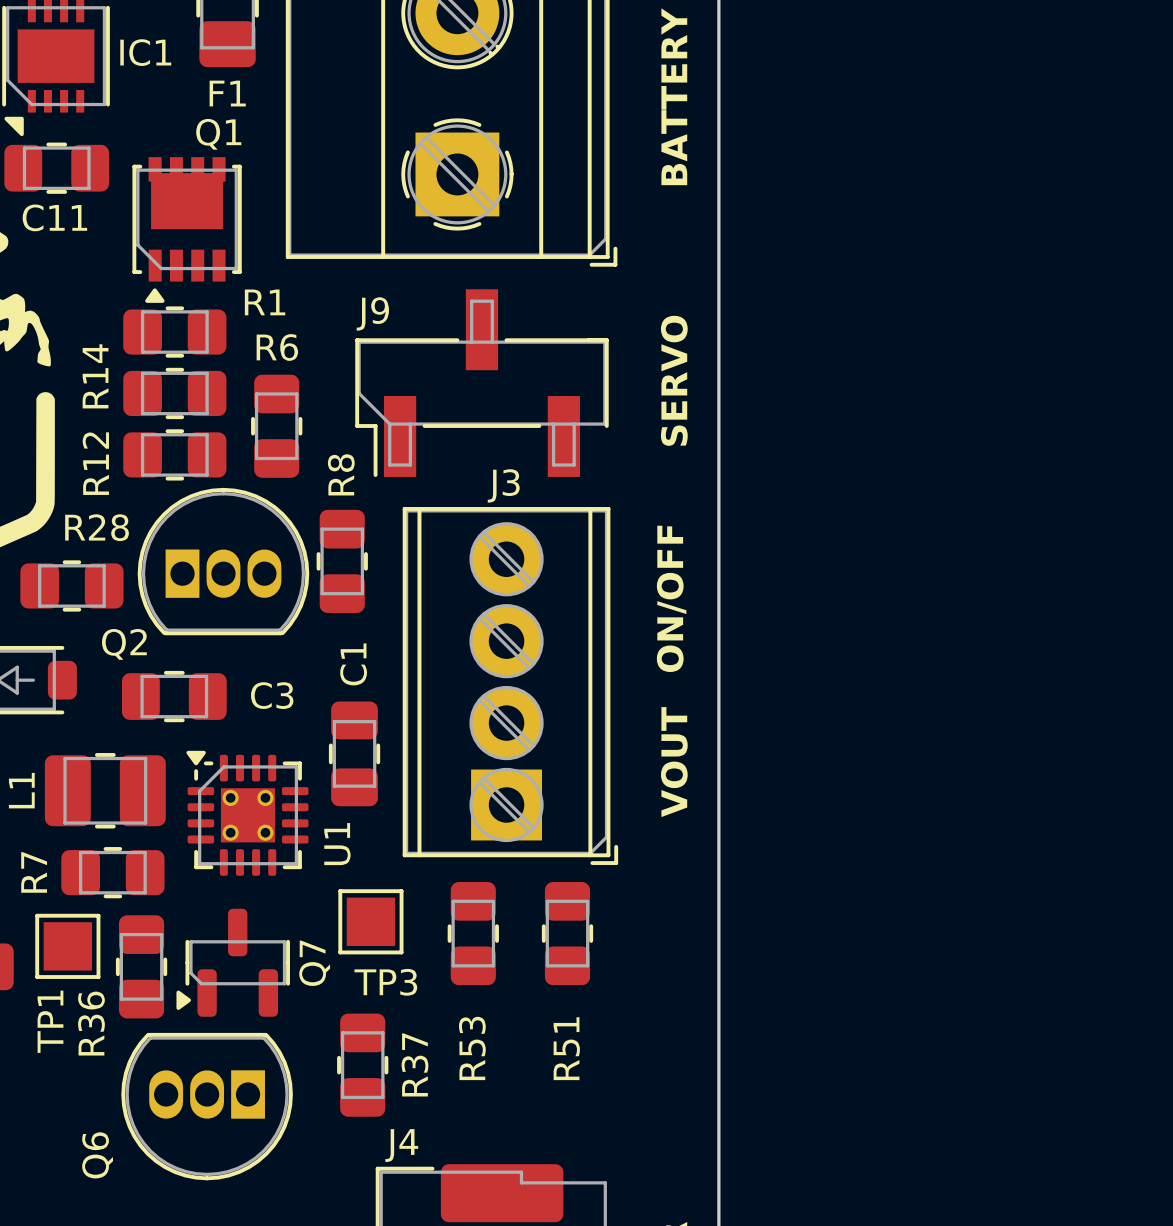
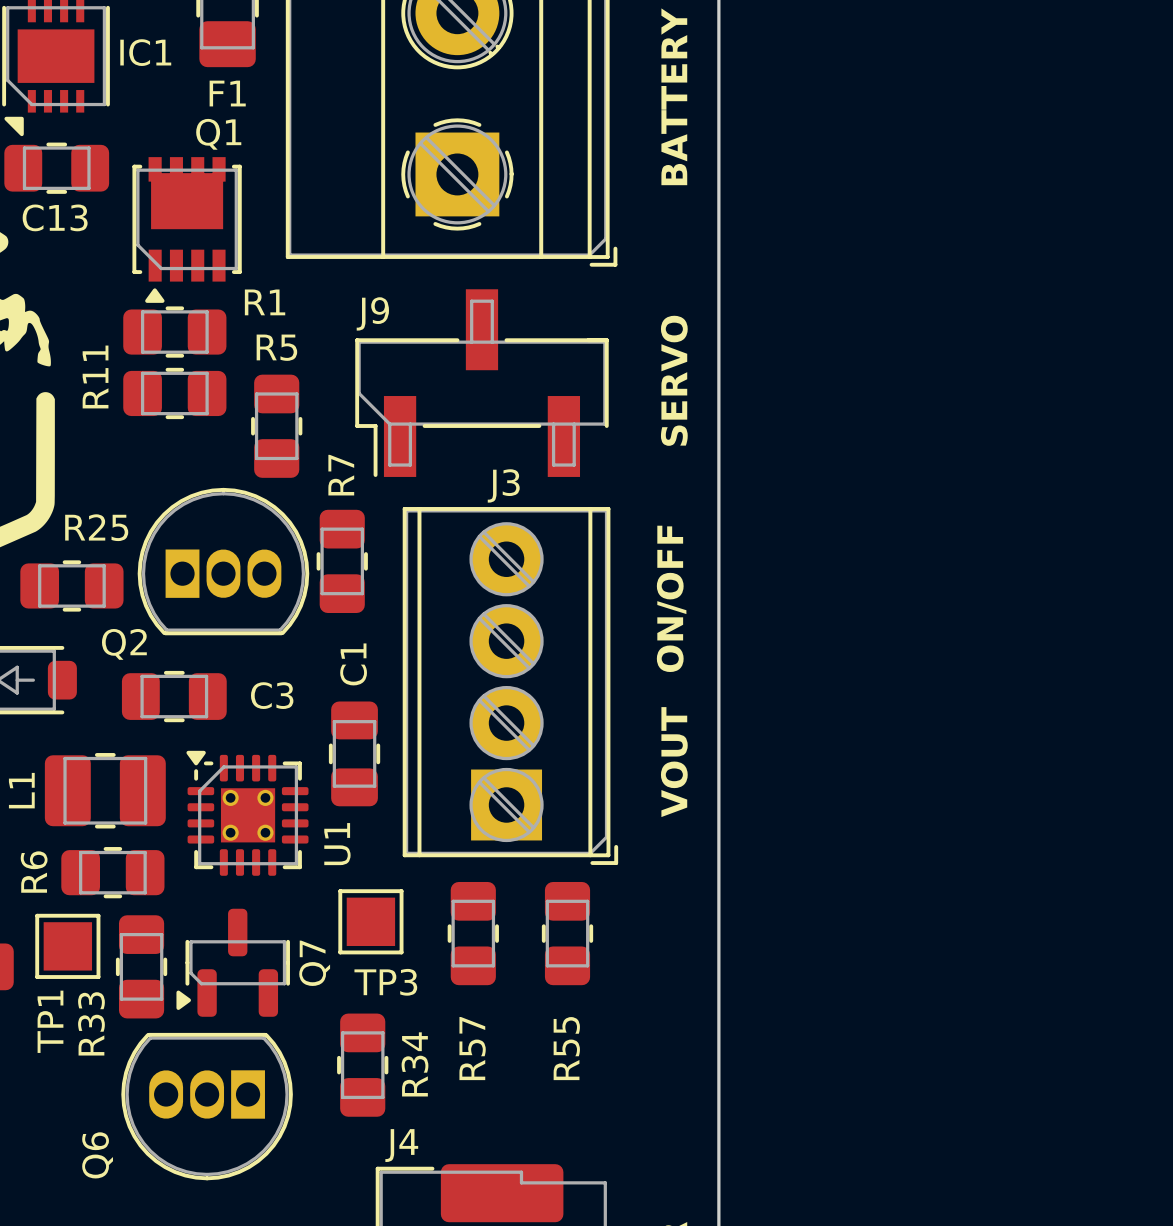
C11 name: C11 (54, 217) -> C13 (55, 217)
R6 name: R6 (277, 347) -> R5 (276, 347)
R14 name: R14 (95, 376) -> R11 (95, 376)
R12: (174, 454) -> none
R8 name: R8 (341, 474) -> R7 (341, 475)
R28 name: R28 (97, 527) -> R25 (96, 527)
R7 name: R7 (34, 872) -> R6 (34, 872)
R36 name: R36 (91, 1023) -> R33 (91, 1023)
R53 name: R53 (472, 1048) -> R57 (472, 1048)
R51 name: R51 (566, 1048) -> R55 (566, 1048)
R37 name: R37 (414, 1064) -> R34 (414, 1064)

